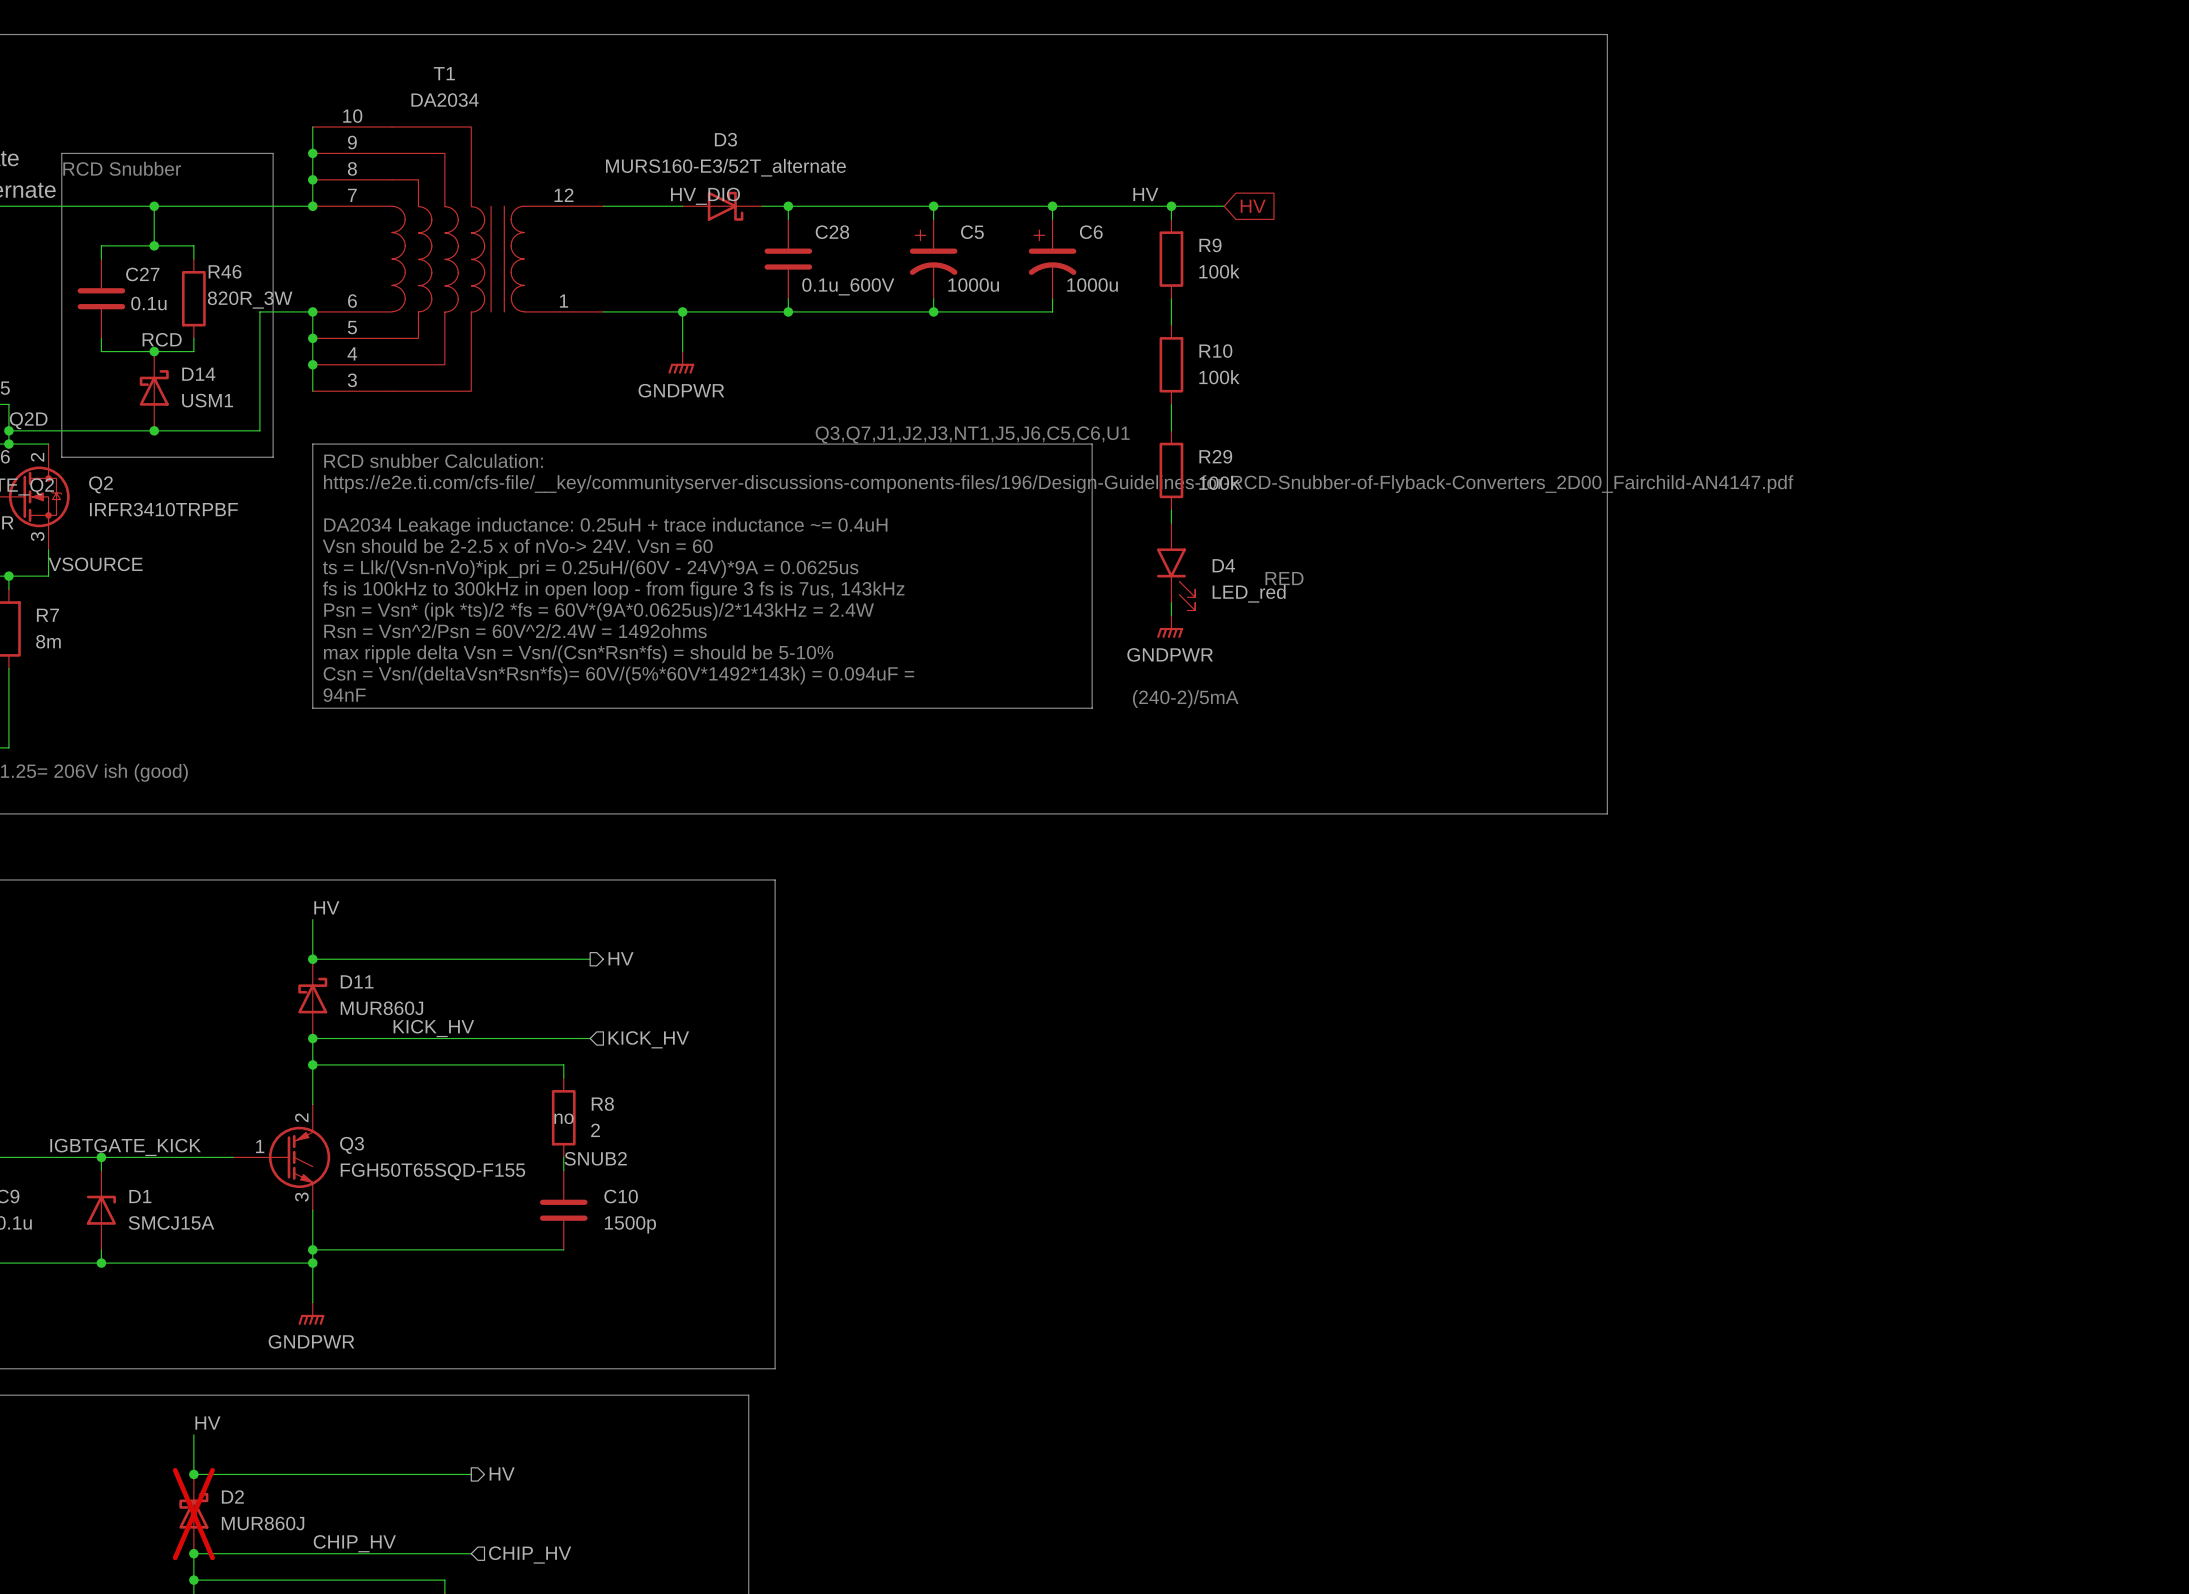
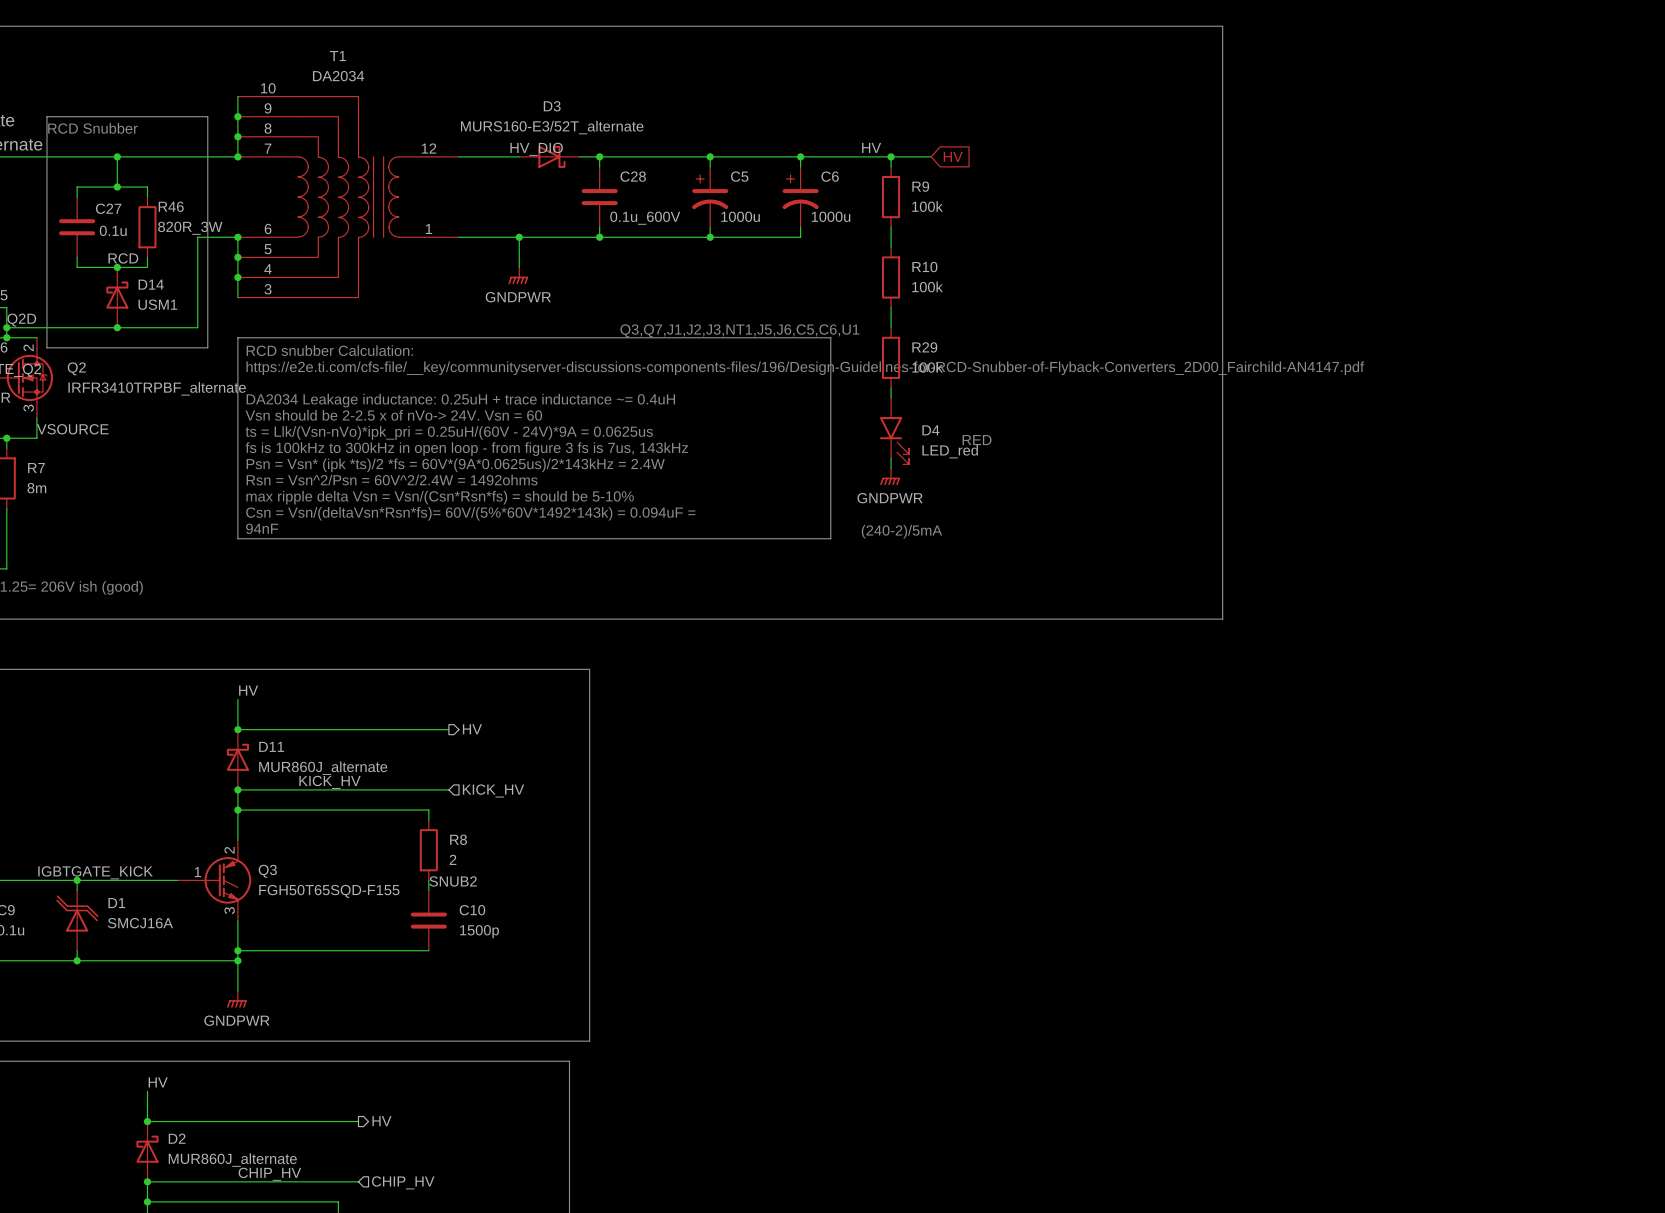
Q2 value: IRFR3410TRPBF (163, 509) -> IRFR3410TRPBF_alternate (157, 388)
D11 value: MUR860J (381, 1008) -> MUR860J_alternate (323, 768)
R8 text: no (563, 1118) -> none
D1 symbol: [86, 1170, 116, 1250] -> [56, 890, 99, 951]
D1 value: SMCJ15A (171, 1222) -> SMCJ16A (140, 923)
D2 do-not-place cross: (193, 1514) -> none
D2 value: MUR860J (263, 1523) -> MUR860J_alternate (232, 1160)

